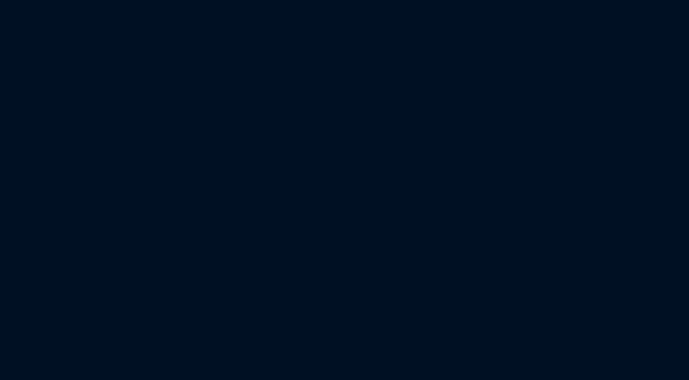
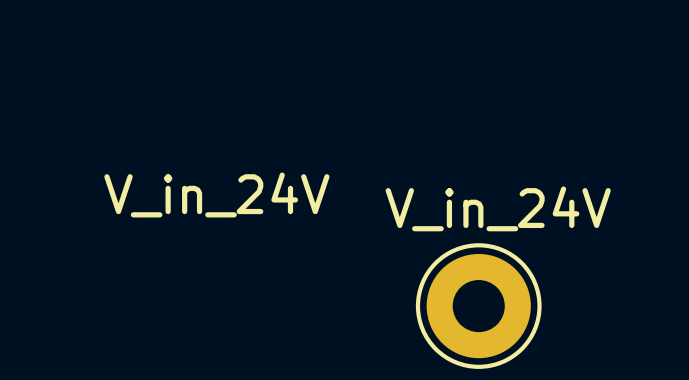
text: none -> V_in_24V (216, 194)
text: none -> V_in_24V (498, 208)
part: none -> (478, 306)

